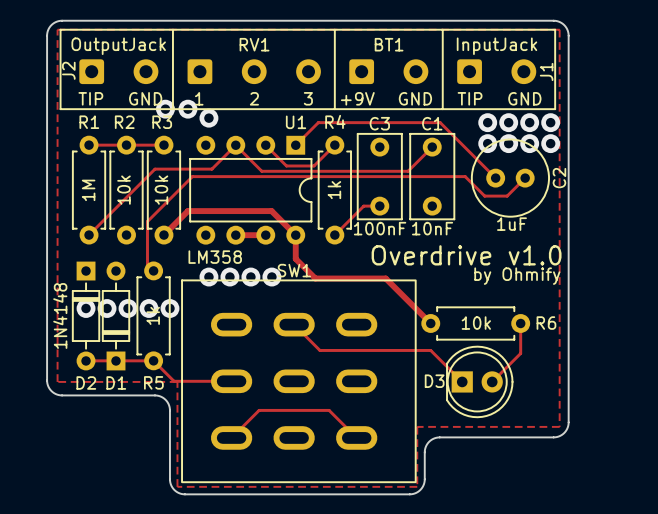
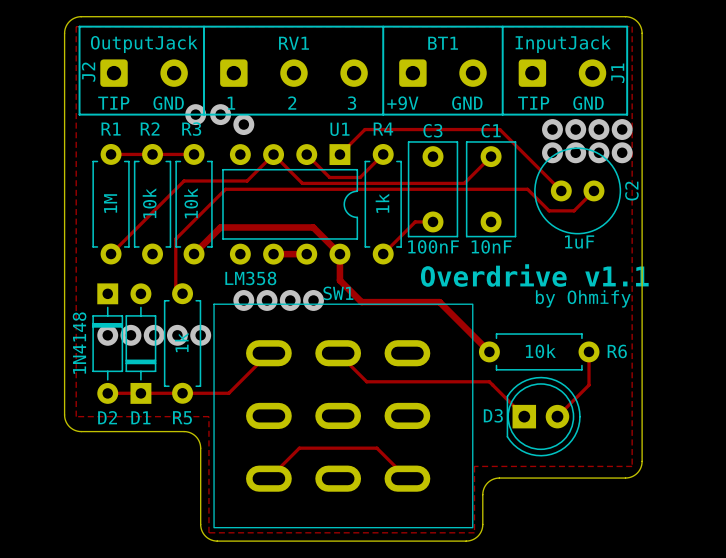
text: Overdrive v1.0 (466, 255) -> Overdrive v1.1 (534, 275)
track: (153, 360) (174, 381) (231, 381) -> (182, 393) (228, 393) (268, 353)

